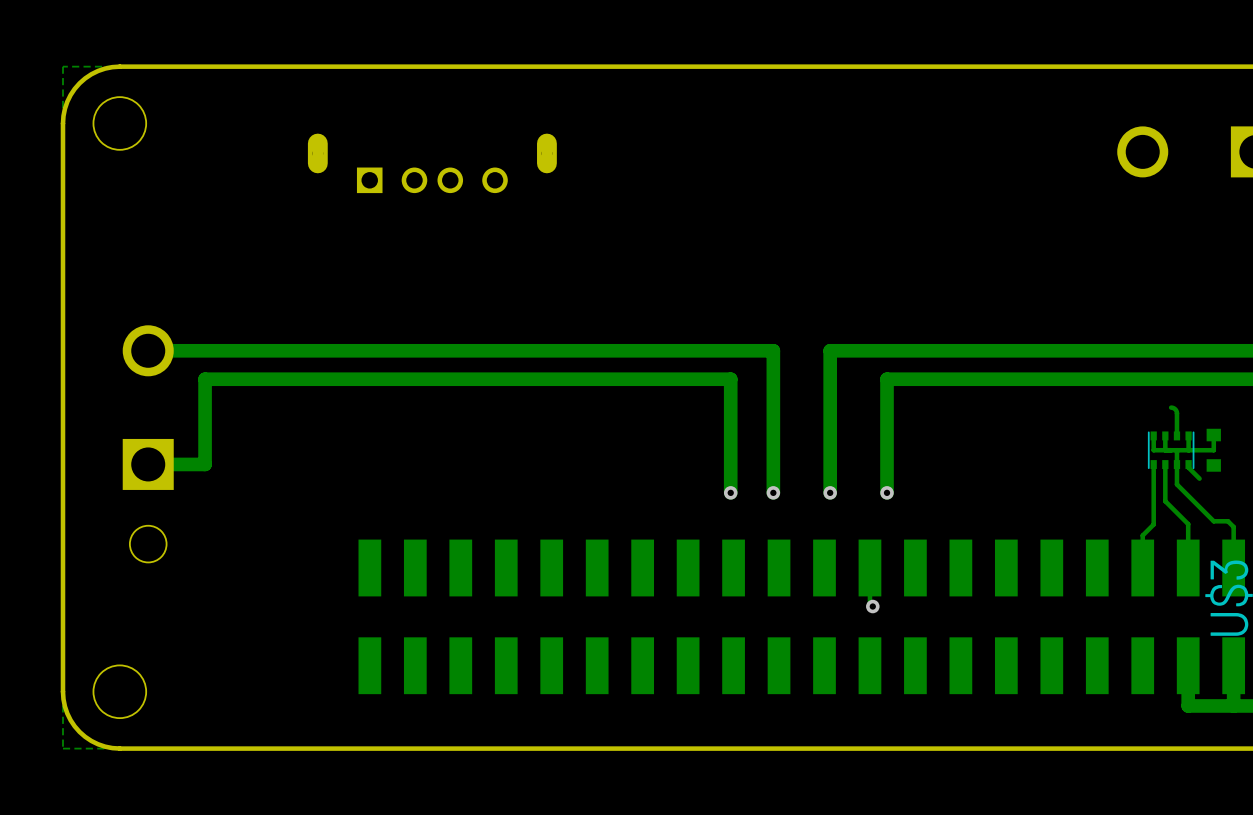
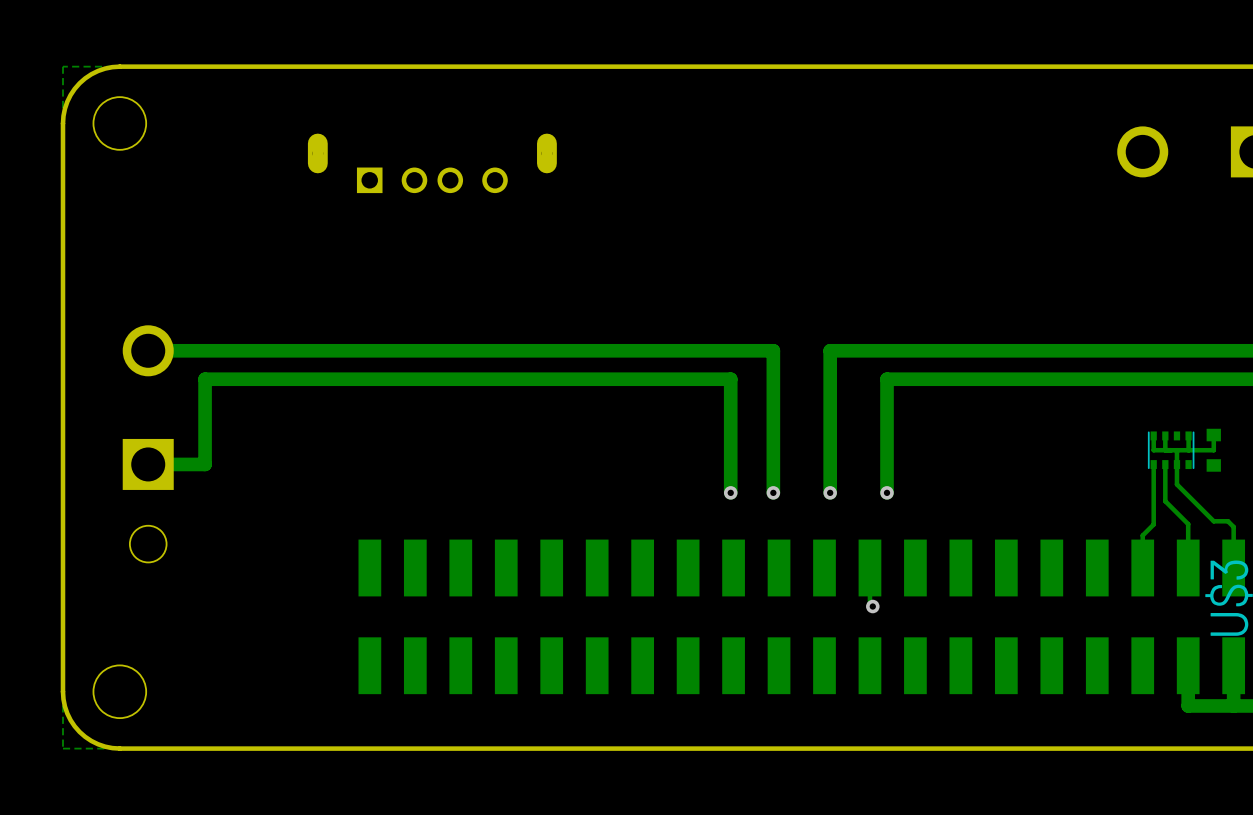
track: (1171, 407) (1176, 411) (1176, 435) -> none
track: (1188, 464) (1188, 467) (1199, 478) -> none

